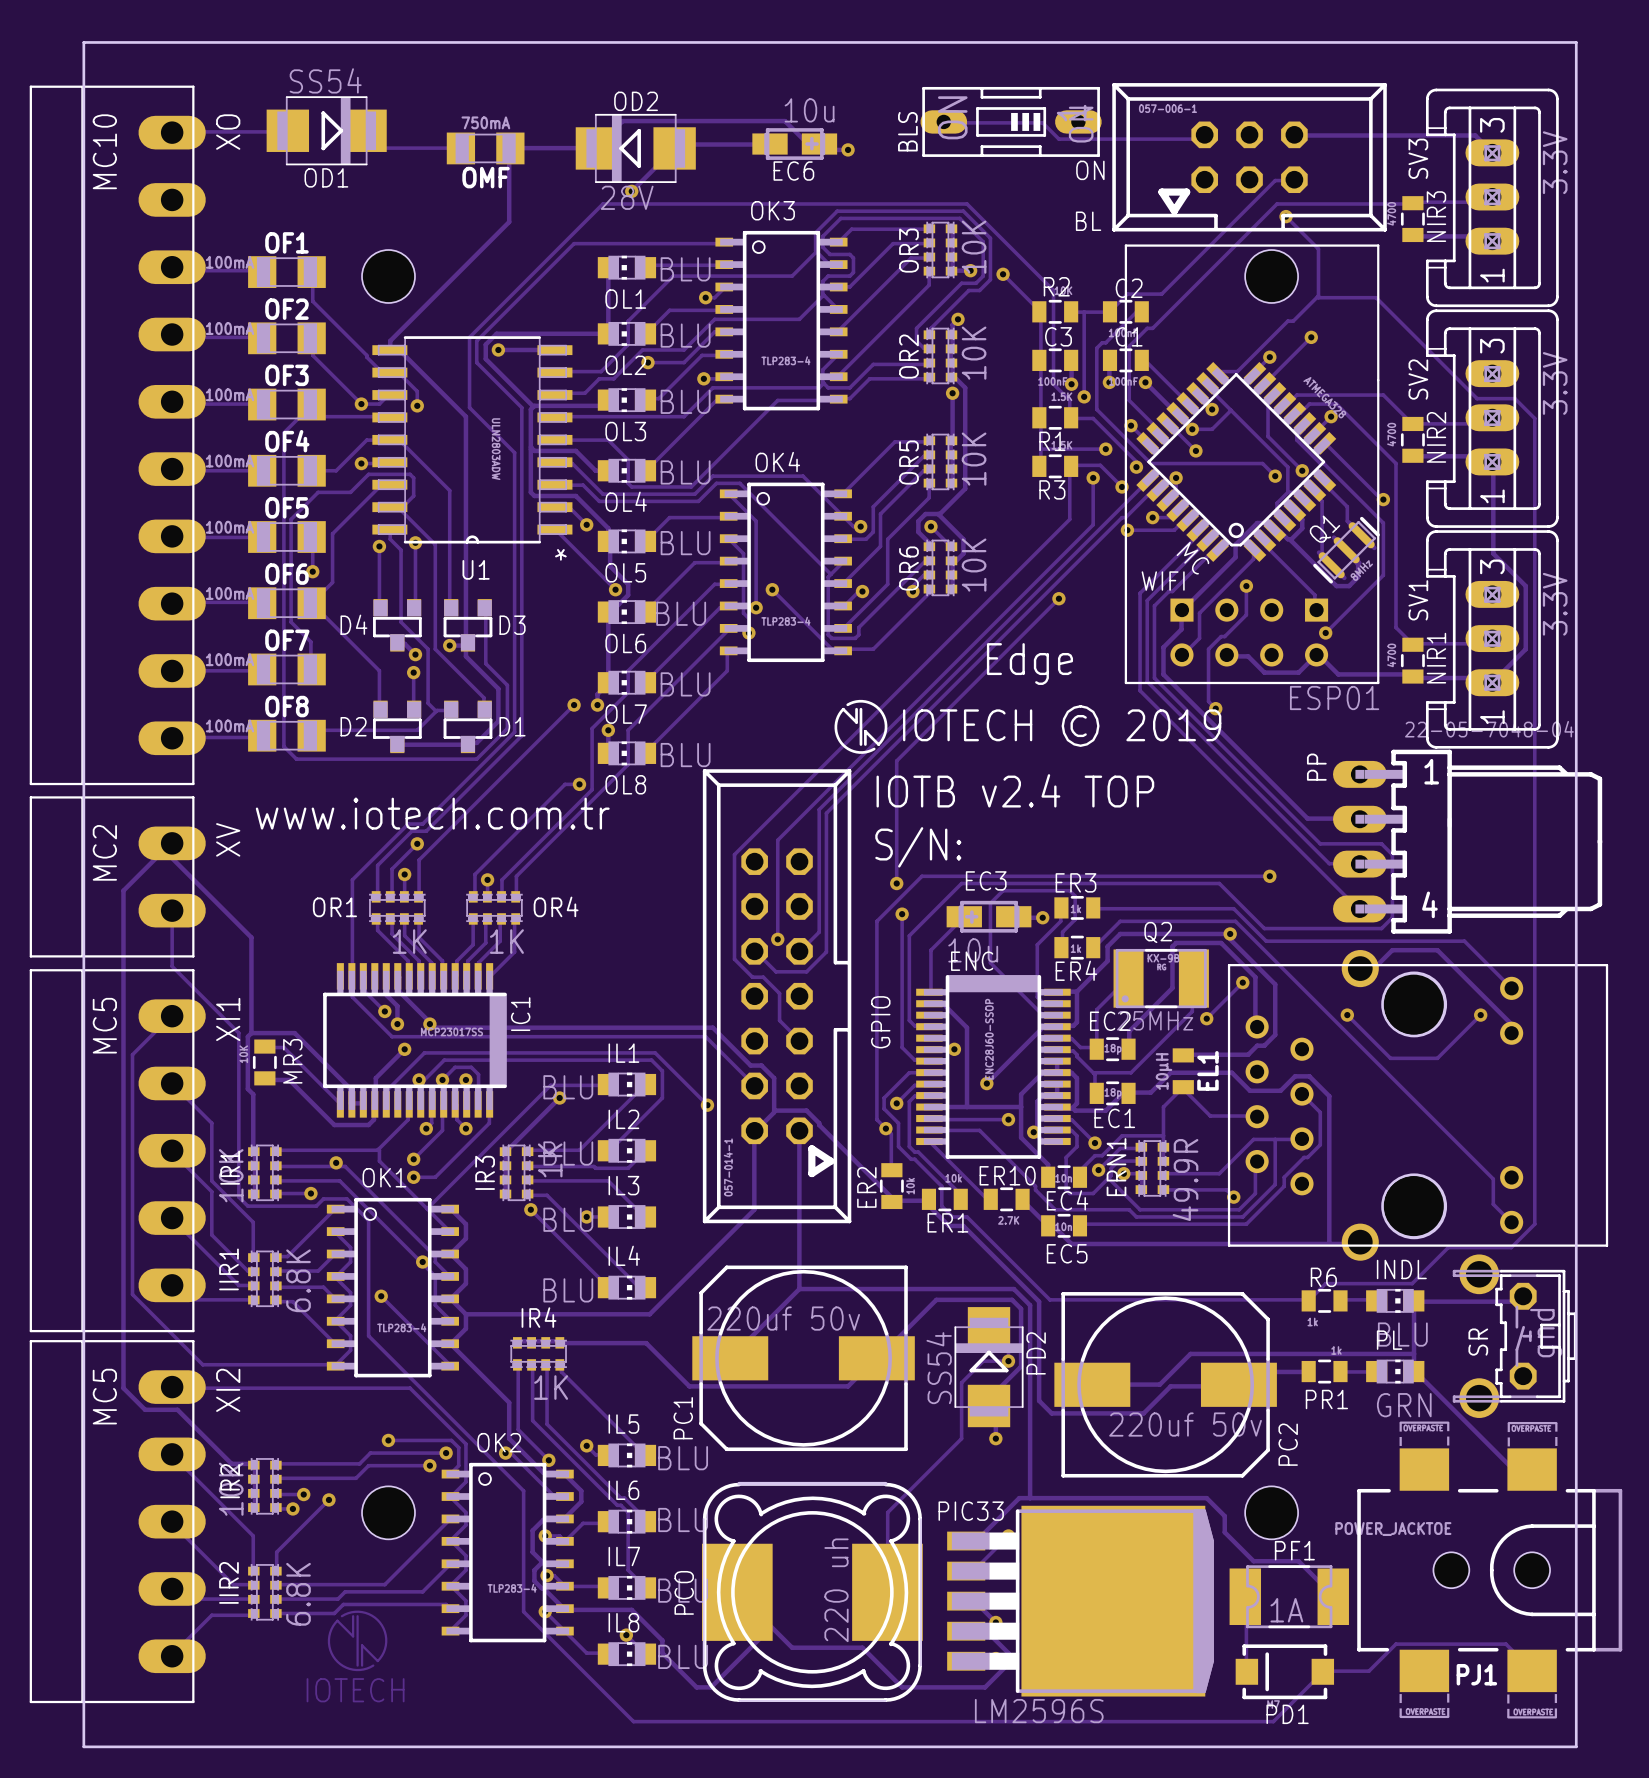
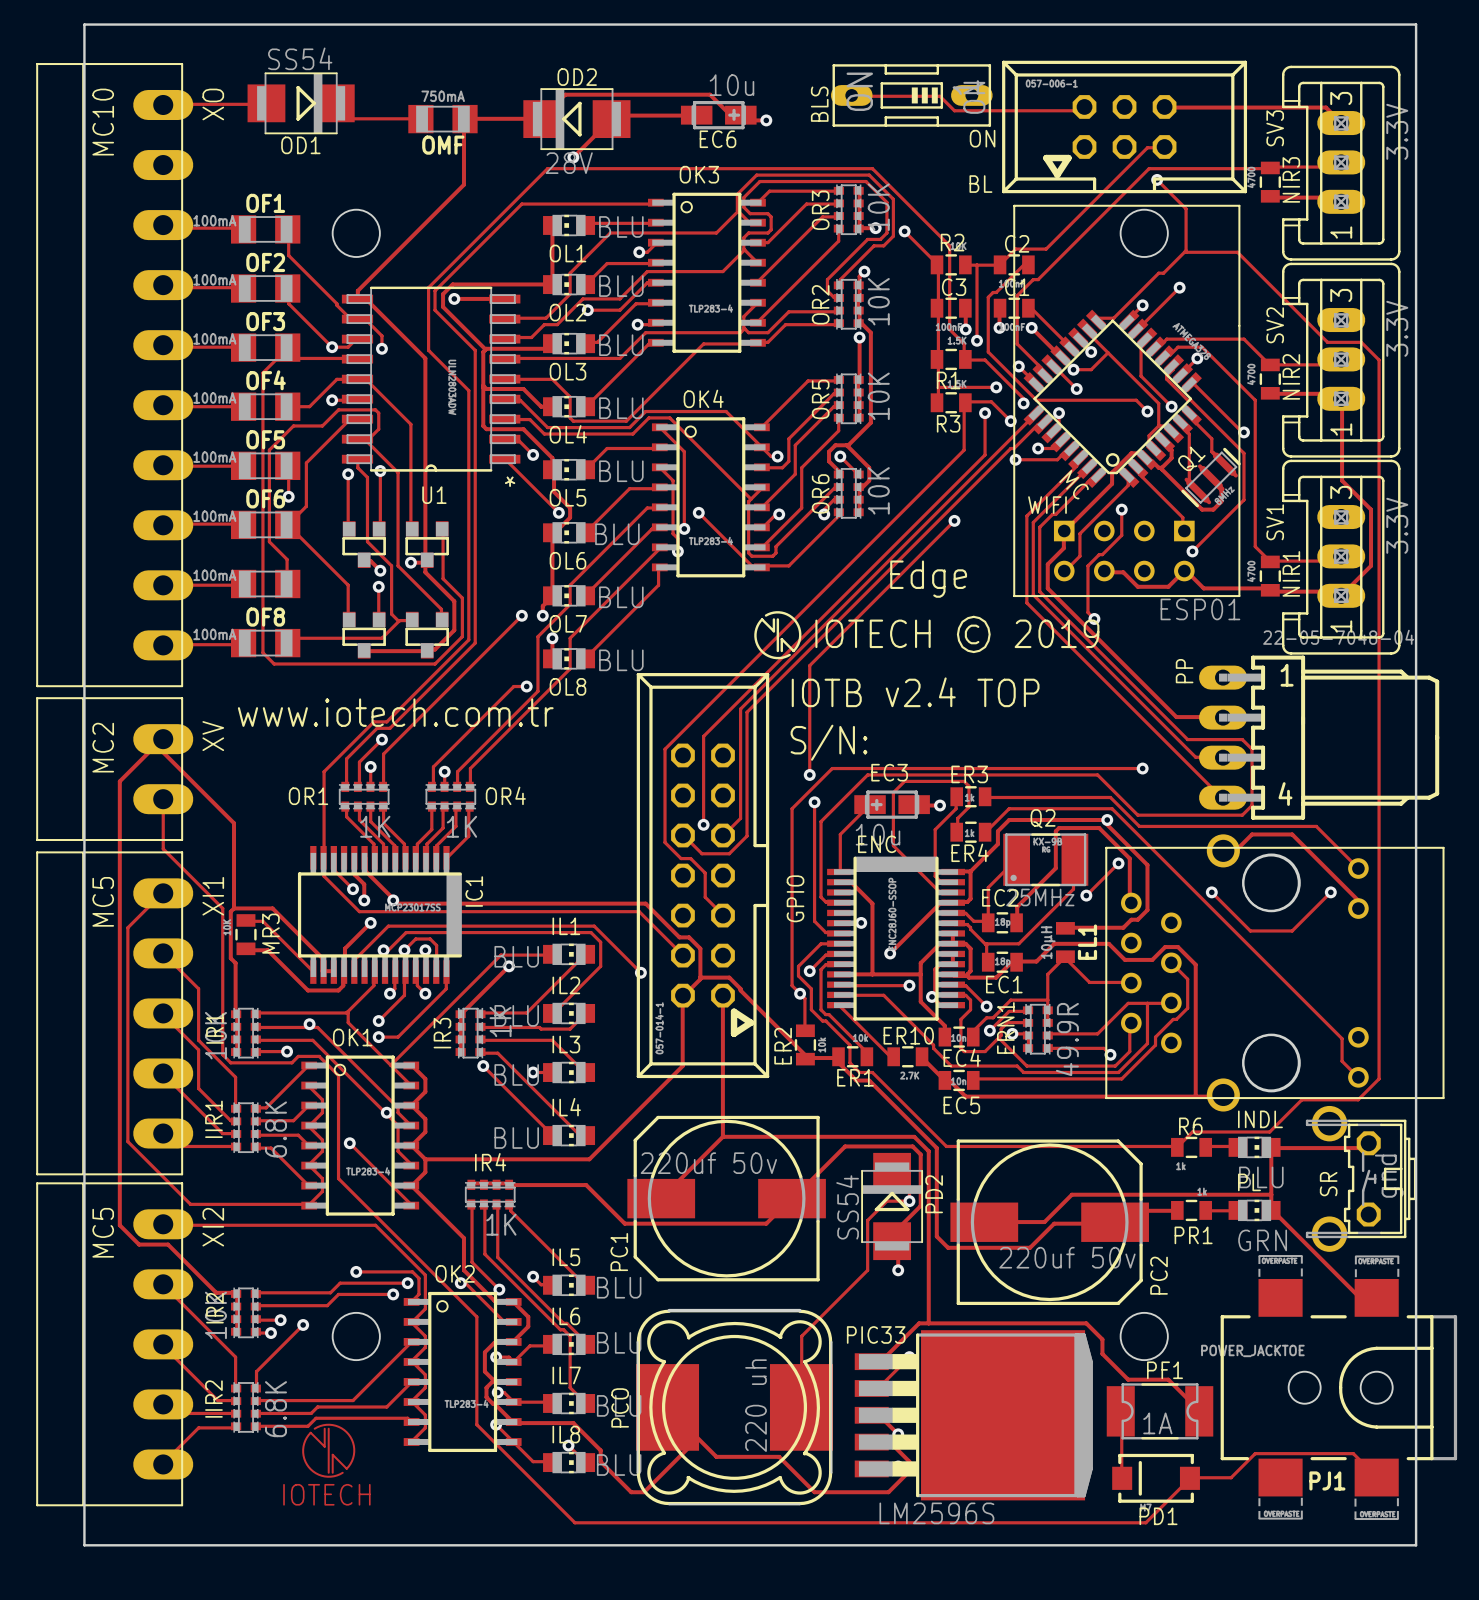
D4 name: D4 (353, 624) -> none
D3 name: D3 (512, 625) -> none
OF7 name: OF7 (287, 640) -> none
D2 name: D2 (353, 726) -> none
D1 name: D1 (512, 726) -> none

